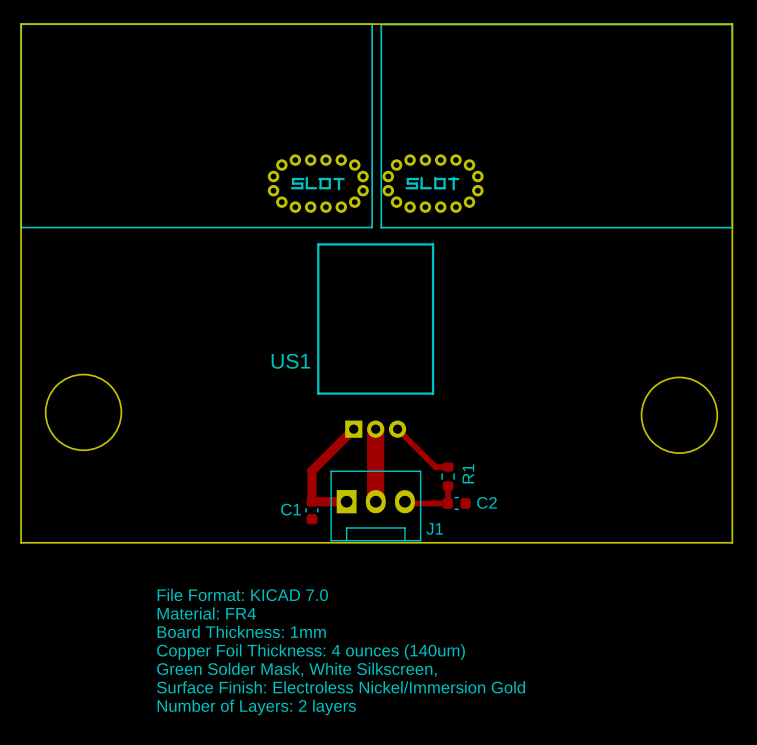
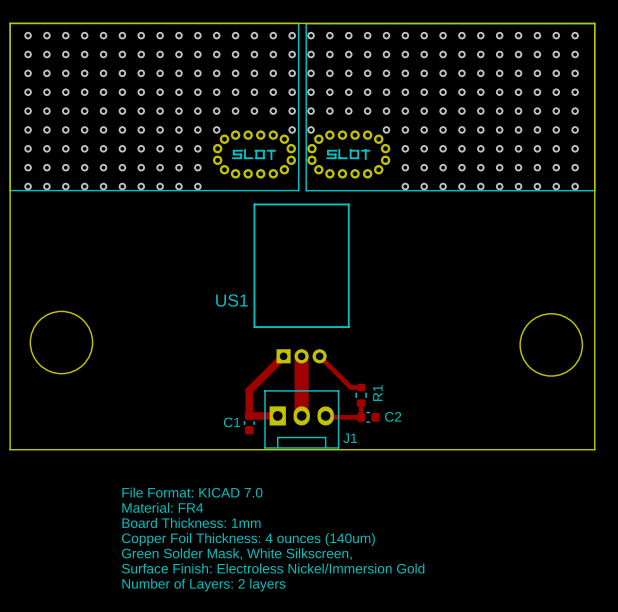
via: none -> (28, 35)
via: none -> (46, 35)
via: none -> (65, 35)
via: none -> (84, 35)
via: none -> (103, 35)
via: none -> (122, 35)
via: none -> (141, 35)
via: none -> (160, 35)
via: none -> (178, 35)
via: none -> (197, 35)
via: none -> (216, 35)
via: none -> (235, 35)
via: none -> (254, 35)
via: none -> (273, 35)
via: none -> (292, 35)
via: none -> (311, 35)
via: none -> (329, 35)
via: none -> (348, 35)
via: none -> (367, 35)
via: none -> (386, 35)
via: none -> (405, 35)
via: none -> (424, 35)
via: none -> (443, 35)
via: none -> (461, 35)
via: none -> (480, 35)
via: none -> (499, 35)
via: none -> (518, 35)
via: none -> (537, 35)
via: none -> (556, 35)
via: none -> (575, 35)
via: none -> (28, 54)
via: none -> (46, 54)
via: none -> (65, 54)
via: none -> (84, 54)
via: none -> (103, 54)
via: none -> (122, 54)
via: none -> (141, 54)
via: none -> (160, 54)
via: none -> (178, 54)
via: none -> (197, 54)
via: none -> (216, 54)
via: none -> (235, 54)
via: none -> (254, 54)
via: none -> (273, 54)
via: none -> (292, 54)
via: none -> (311, 54)
via: none -> (329, 54)
via: none -> (348, 54)
via: none -> (367, 54)
via: none -> (386, 54)
via: none -> (405, 54)
via: none -> (424, 54)
via: none -> (443, 54)
via: none -> (461, 54)
via: none -> (480, 54)
via: none -> (499, 54)
via: none -> (518, 54)
via: none -> (537, 54)
via: none -> (556, 54)
via: none -> (575, 54)
via: none -> (28, 73)
via: none -> (46, 73)
via: none -> (65, 73)
via: none -> (84, 73)
via: none -> (103, 73)
via: none -> (122, 73)
via: none -> (141, 73)
via: none -> (160, 73)
via: none -> (178, 73)
via: none -> (197, 73)
via: none -> (216, 73)
via: none -> (235, 73)
via: none -> (254, 73)
via: none -> (273, 73)
via: none -> (292, 73)
via: none -> (311, 73)
via: none -> (329, 73)
via: none -> (348, 73)
via: none -> (367, 73)
via: none -> (386, 73)
via: none -> (405, 73)
via: none -> (424, 73)
via: none -> (443, 73)
via: none -> (461, 73)
via: none -> (480, 73)
via: none -> (499, 73)
via: none -> (518, 73)
via: none -> (537, 73)
via: none -> (556, 73)
via: none -> (575, 73)
via: none -> (28, 92)
via: none -> (46, 92)
via: none -> (65, 92)
via: none -> (84, 92)
via: none -> (103, 92)
via: none -> (122, 92)
via: none -> (141, 92)
via: none -> (160, 92)
via: none -> (178, 92)
via: none -> (197, 92)
via: none -> (216, 92)
via: none -> (235, 92)
via: none -> (254, 92)
via: none -> (273, 92)
via: none -> (292, 92)
via: none -> (311, 92)
via: none -> (329, 92)
via: none -> (348, 92)
via: none -> (367, 92)
via: none -> (386, 92)
via: none -> (405, 92)
via: none -> (424, 92)
via: none -> (443, 92)
via: none -> (461, 92)
via: none -> (480, 92)
via: none -> (499, 92)
via: none -> (518, 92)
via: none -> (537, 92)
via: none -> (556, 92)
via: none -> (575, 92)
via: none -> (28, 111)
via: none -> (46, 111)
via: none -> (65, 111)
via: none -> (84, 111)
via: none -> (103, 111)
via: none -> (122, 111)
via: none -> (141, 111)
via: none -> (160, 111)
via: none -> (178, 111)
via: none -> (197, 111)
via: none -> (216, 111)
via: none -> (235, 111)
via: none -> (254, 111)
via: none -> (273, 111)
via: none -> (292, 111)
via: none -> (311, 111)
via: none -> (329, 111)
via: none -> (348, 111)
via: none -> (367, 111)
via: none -> (386, 111)
via: none -> (405, 111)
via: none -> (424, 111)
via: none -> (443, 111)
via: none -> (461, 111)
via: none -> (480, 111)
via: none -> (499, 111)
via: none -> (518, 111)
via: none -> (537, 111)
via: none -> (556, 111)
via: none -> (575, 111)
via: none -> (28, 129)
via: none -> (46, 129)
via: none -> (65, 129)
via: none -> (84, 129)
via: none -> (103, 129)
via: none -> (122, 129)
via: none -> (141, 129)
via: none -> (160, 129)
via: none -> (178, 129)
via: none -> (197, 129)
via: none -> (216, 129)
via: none -> (292, 129)
via: none -> (311, 129)
via: none -> (386, 129)
via: none -> (405, 129)
via: none -> (424, 129)
via: none -> (443, 129)
via: none -> (461, 129)
via: none -> (480, 129)
via: none -> (499, 129)
via: none -> (518, 129)
via: none -> (537, 129)
via: none -> (556, 129)
via: none -> (575, 129)
via: none -> (28, 148)
via: none -> (46, 148)
via: none -> (65, 148)
via: none -> (84, 148)
via: none -> (103, 148)
via: none -> (122, 148)
via: none -> (141, 148)
via: none -> (160, 148)
via: none -> (178, 148)
via: none -> (197, 148)
via: none -> (405, 148)
via: none -> (424, 148)
via: none -> (443, 148)
via: none -> (461, 148)
via: none -> (480, 148)
via: none -> (499, 148)
via: none -> (518, 148)
via: none -> (537, 148)
via: none -> (556, 148)
via: none -> (575, 148)
via: none -> (28, 167)
via: none -> (46, 167)
via: none -> (65, 167)
via: none -> (84, 167)
via: none -> (103, 167)
via: none -> (122, 167)
via: none -> (141, 167)
via: none -> (160, 167)
via: none -> (178, 167)
via: none -> (197, 167)
via: none -> (405, 167)
via: none -> (424, 167)
via: none -> (443, 167)
via: none -> (461, 167)
via: none -> (480, 167)
via: none -> (499, 167)
via: none -> (518, 167)
via: none -> (537, 167)
via: none -> (556, 167)
via: none -> (575, 167)
via: none -> (28, 186)
via: none -> (46, 186)
via: none -> (65, 186)
via: none -> (84, 186)
via: none -> (103, 186)
via: none -> (122, 186)
via: none -> (141, 186)
via: none -> (160, 186)
via: none -> (178, 186)
via: none -> (197, 186)
via: none -> (405, 186)
via: none -> (424, 186)
via: none -> (443, 186)
via: none -> (461, 186)
via: none -> (480, 186)
via: none -> (499, 186)
via: none -> (518, 186)
via: none -> (537, 186)
via: none -> (556, 186)
via: none -> (575, 186)

